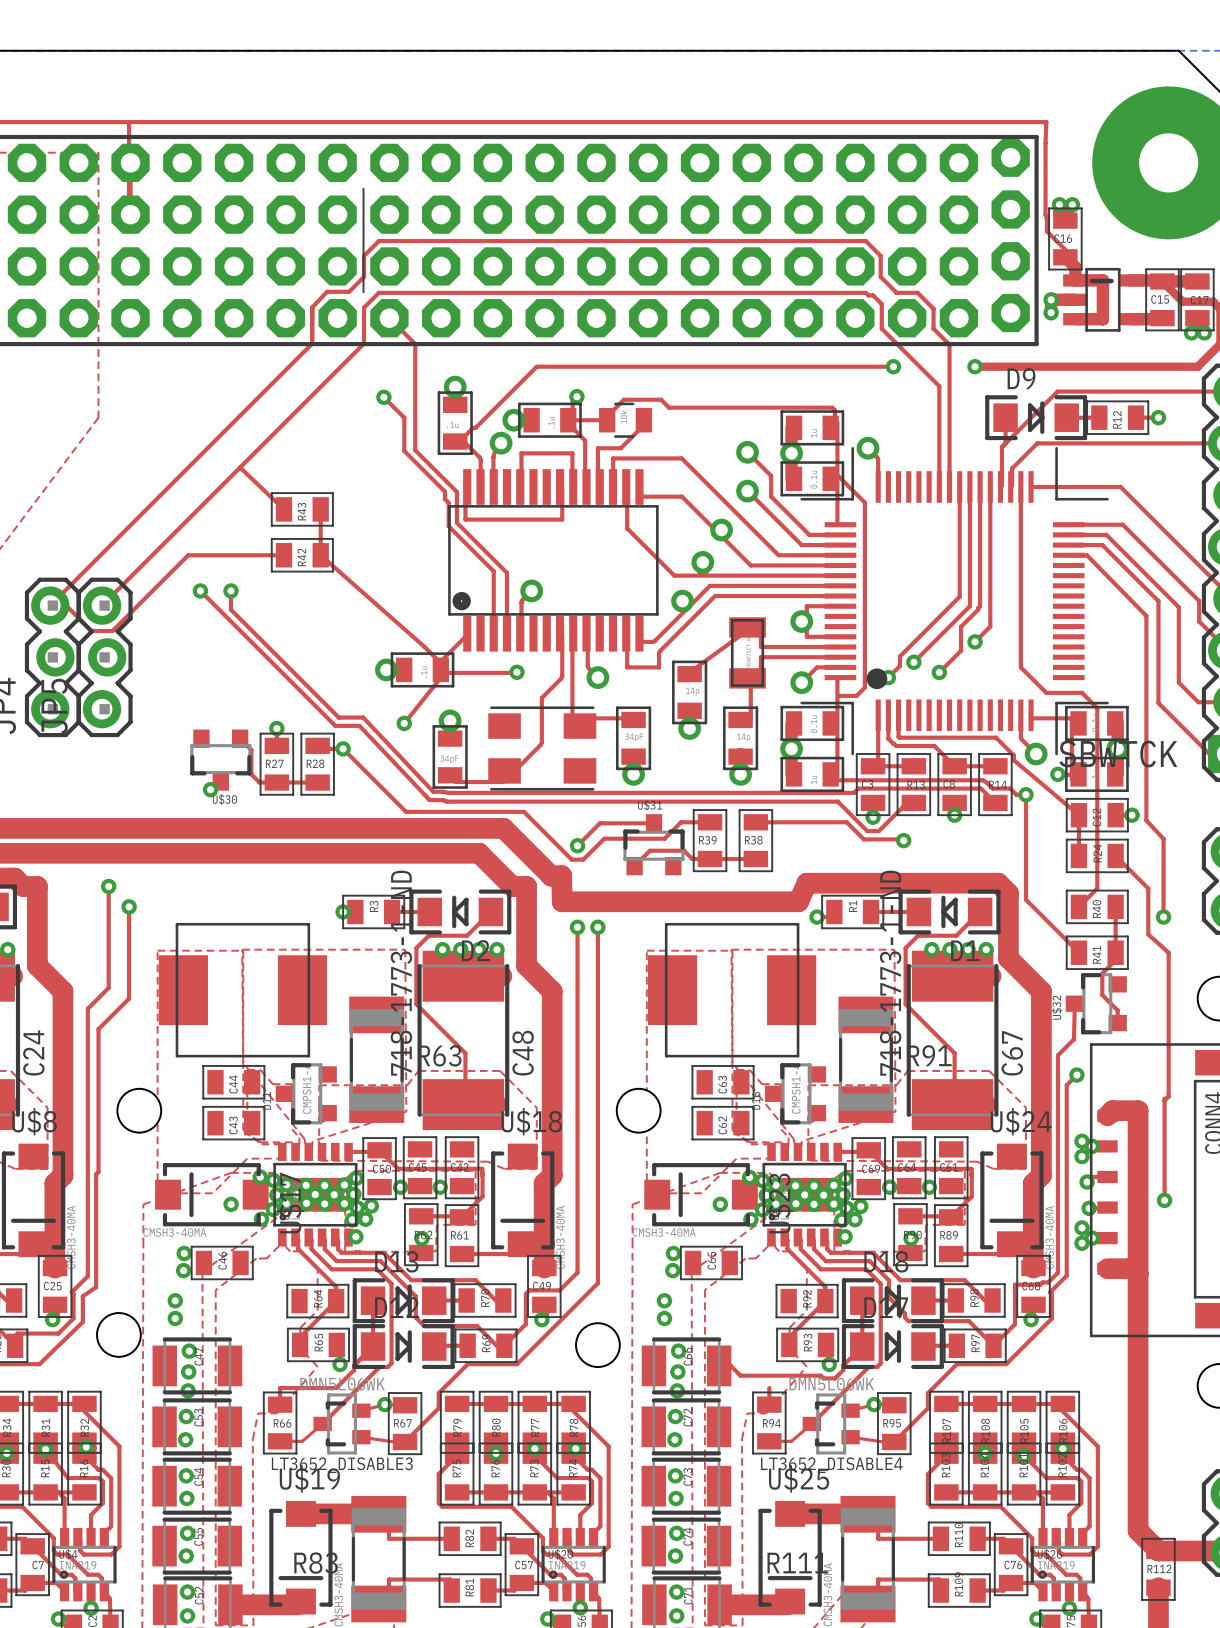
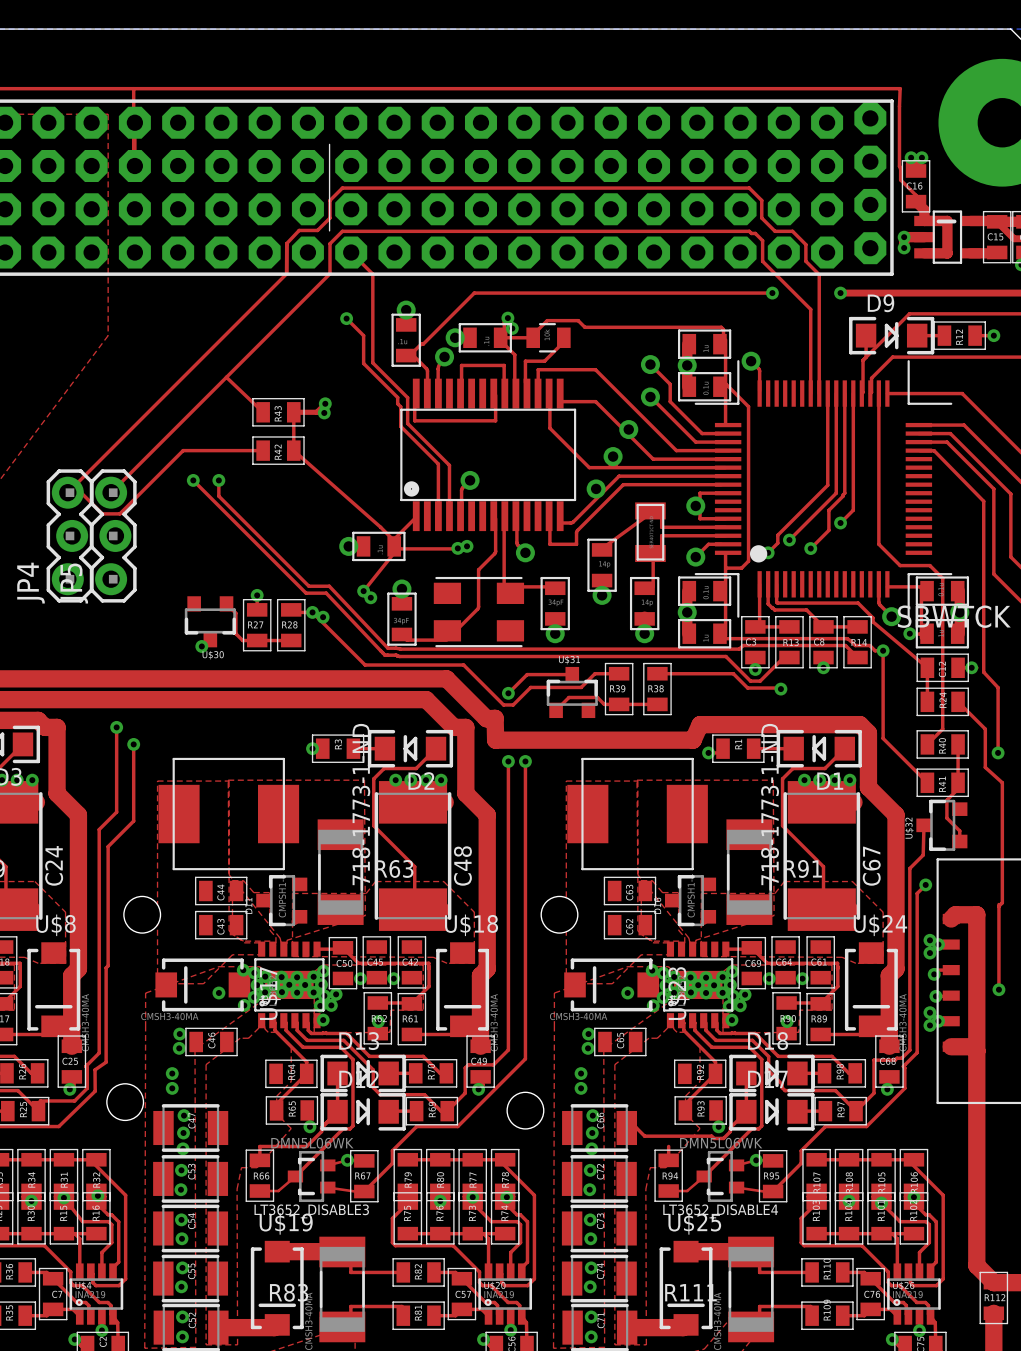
via: none -> (512, 328)
top track: none -> (325, 403) (316, 412) (293, 412)
via: none -> (325, 403)
via: none -> (324, 412)
via: none -> (467, 546)
via: none -> (370, 597)
via: none -> (323, 617)

